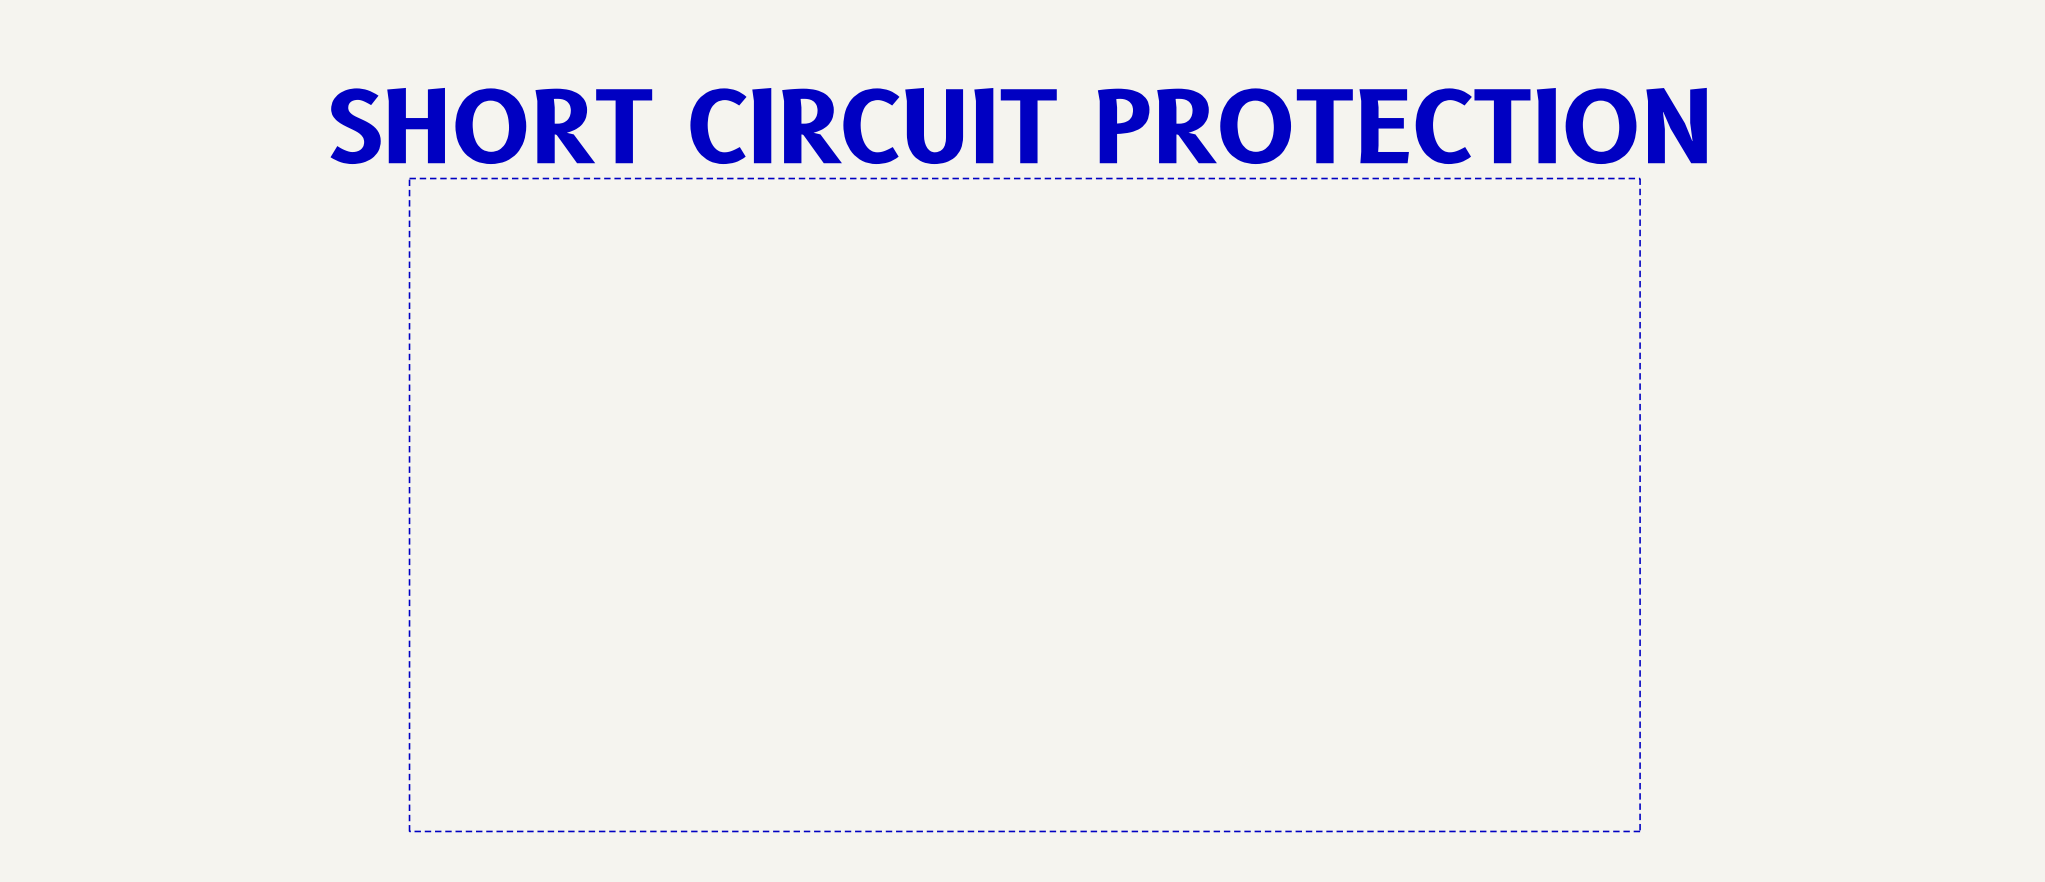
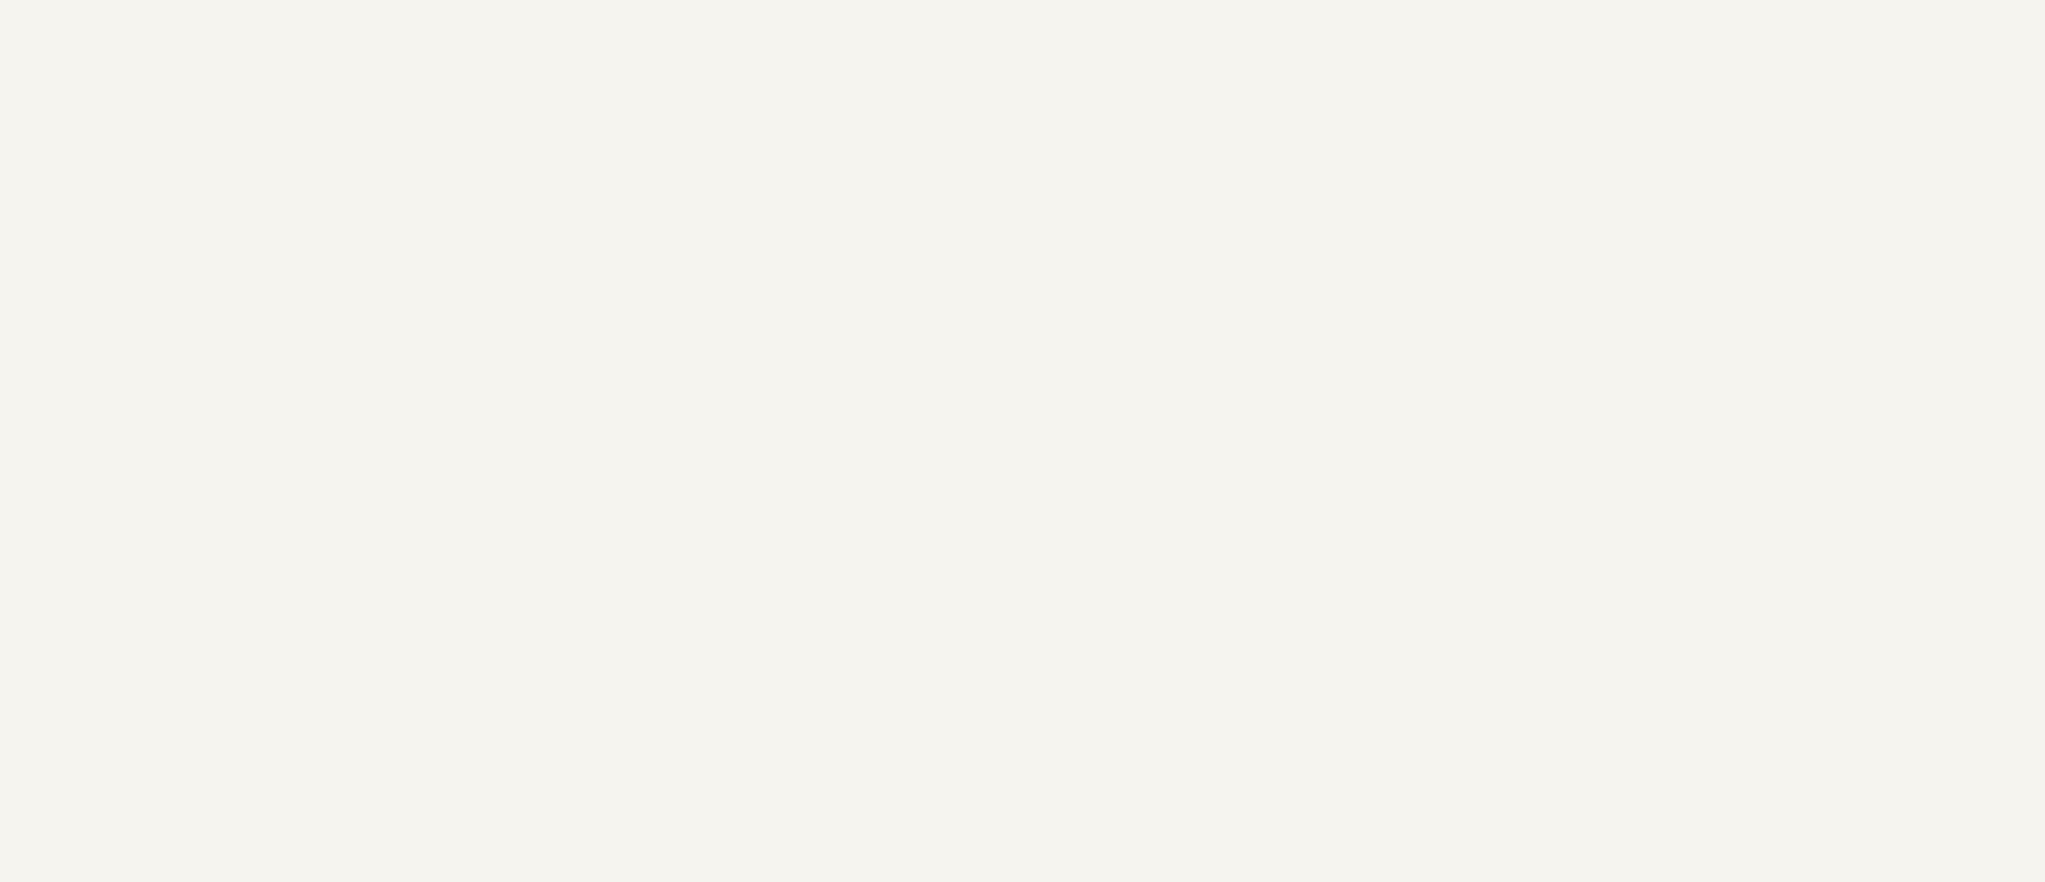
text: SHORT CIRCUIT PROTECTION (1018, 125) -> none
line: (409, 178) (1640, 178) (1640, 831) (409, 831) (409, 178) -> none

